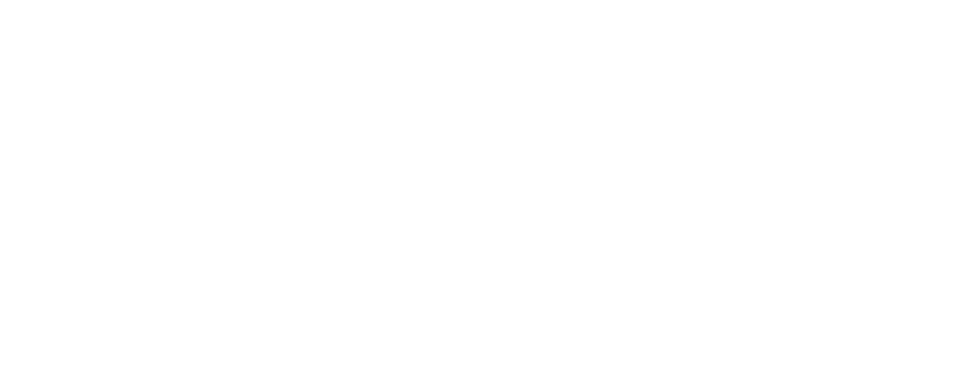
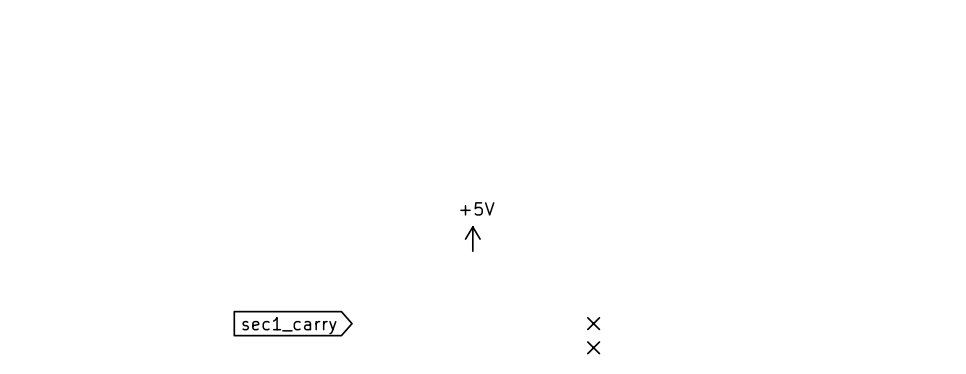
power symbol: none -> +5V (472, 239)
no-connect mark: none -> (593, 323)
global label: none -> sec1_carry (289, 325)
no-connect mark: none -> (593, 347)

